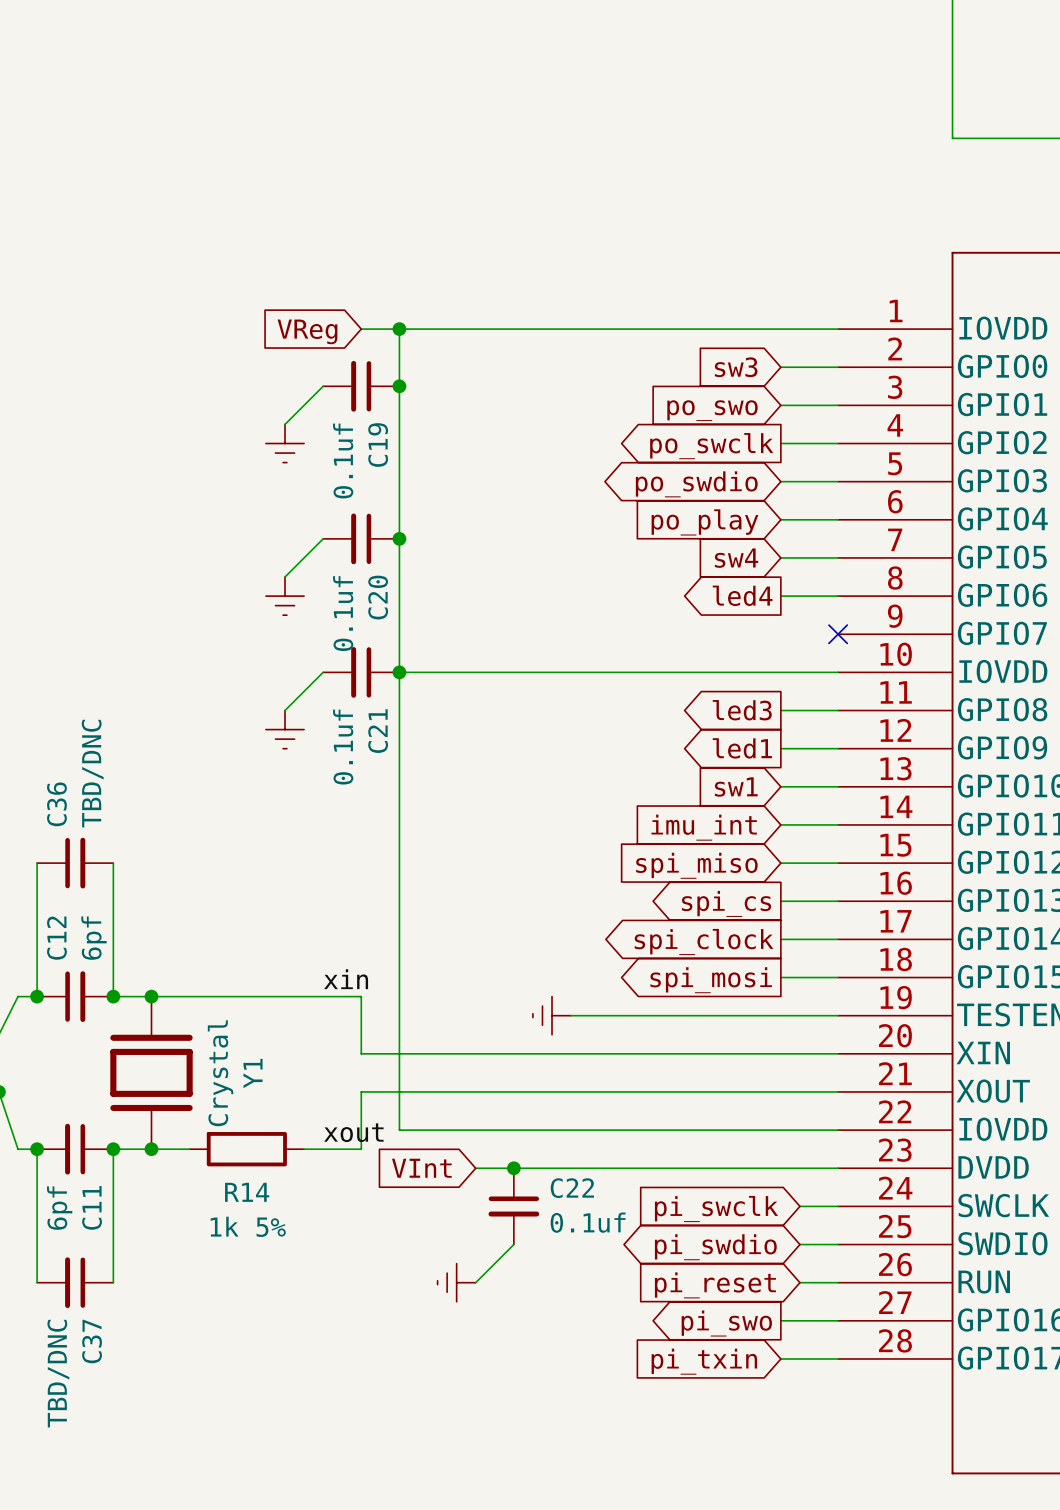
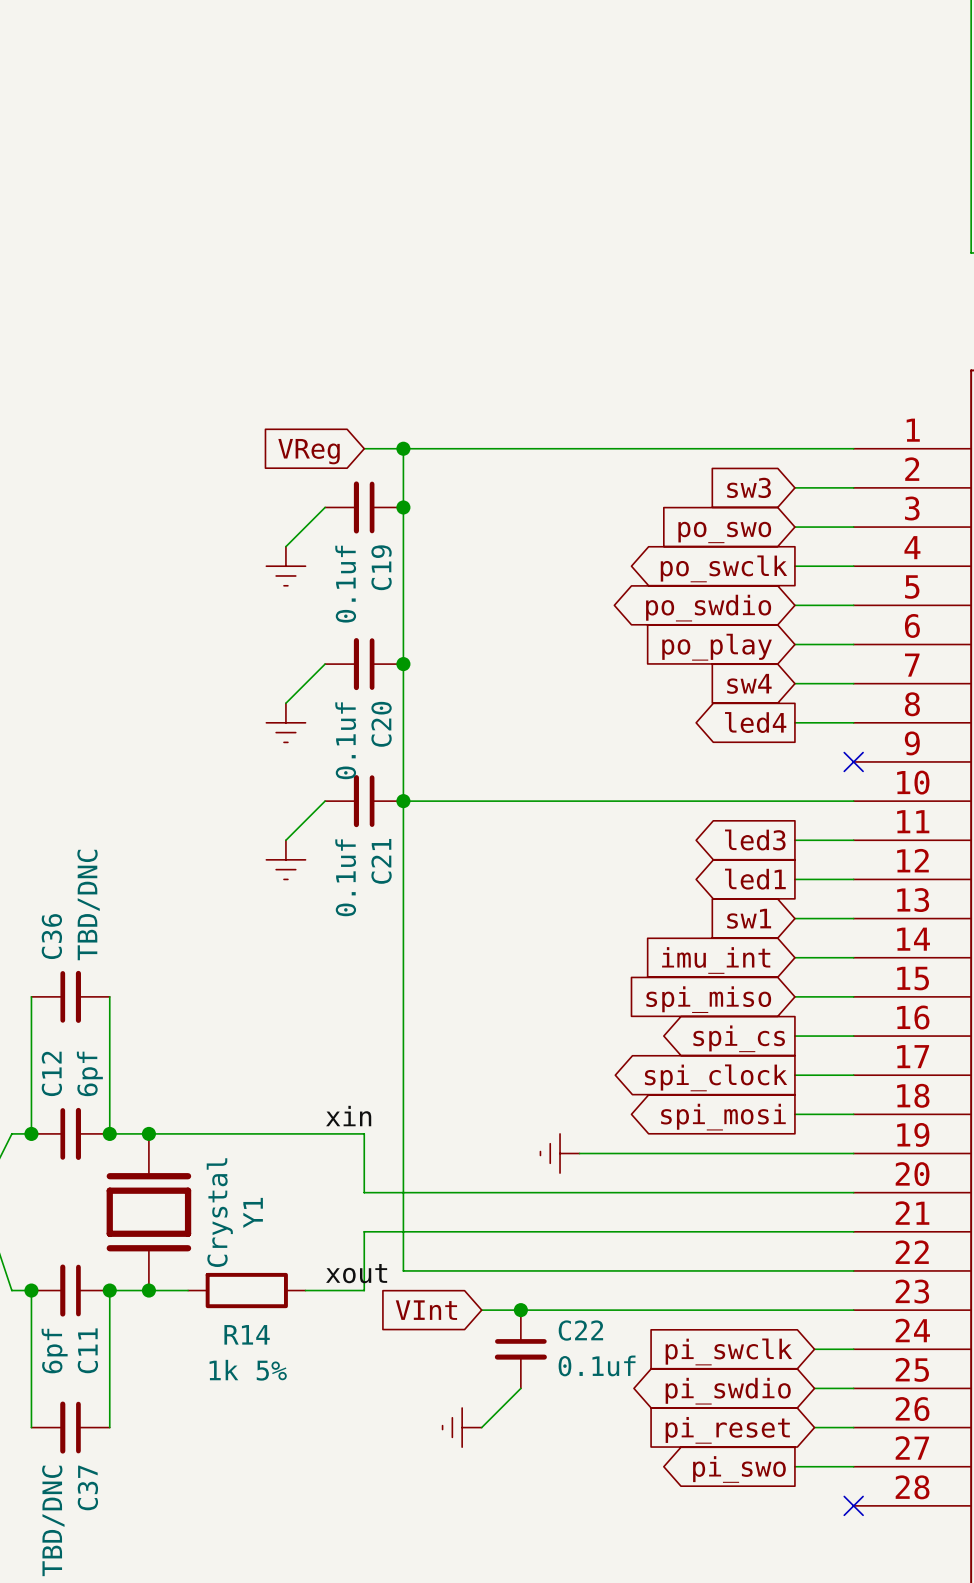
wire: (780, 1358) (838, 1358) -> none
no-connect mark: none -> (853, 1505)
global label: pi_txin (704, 1361) -> none

